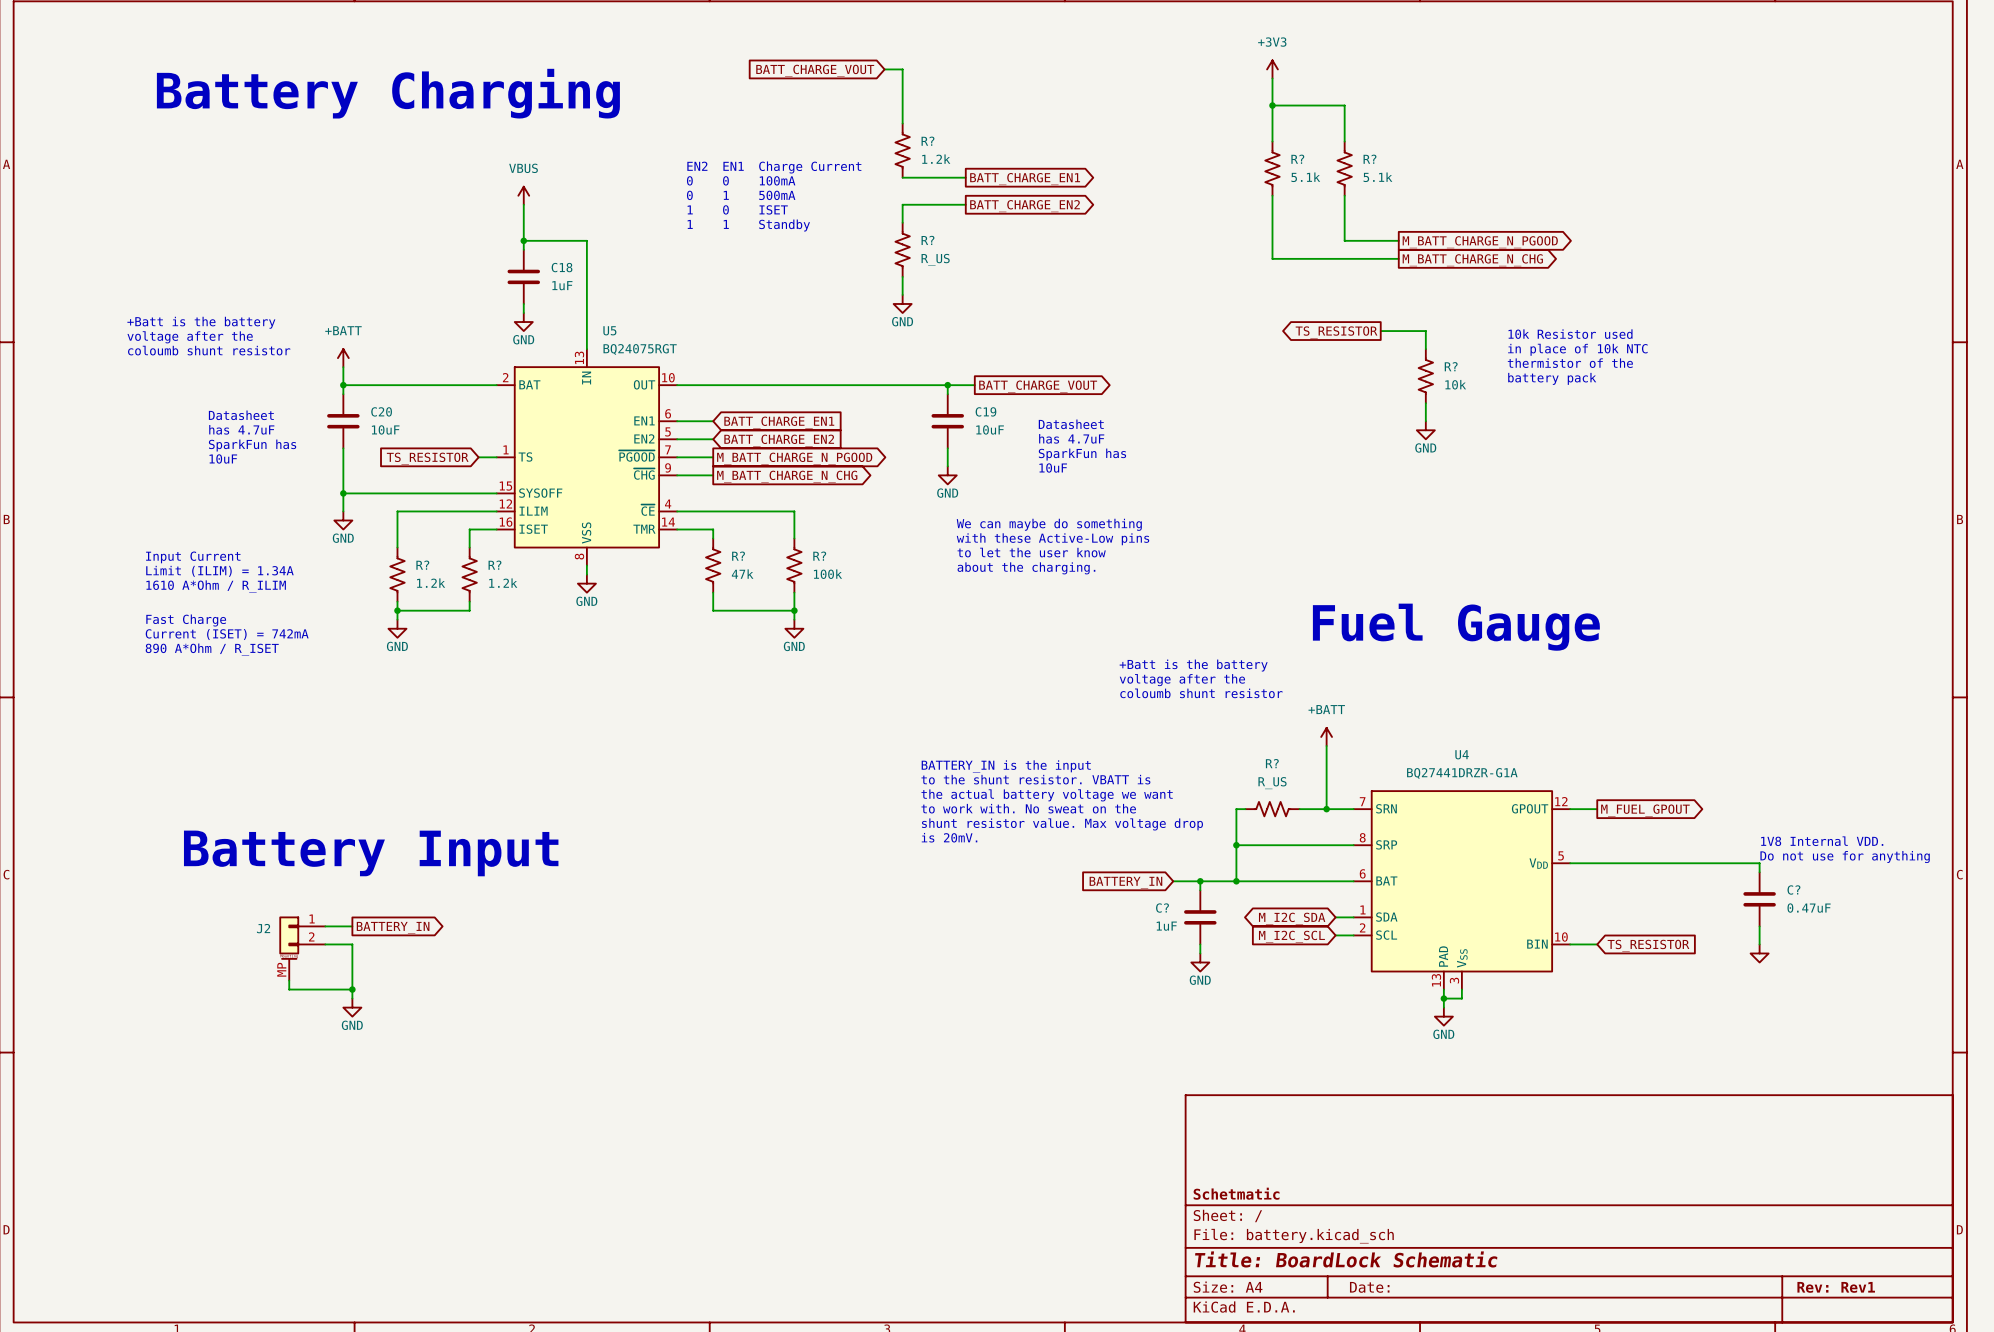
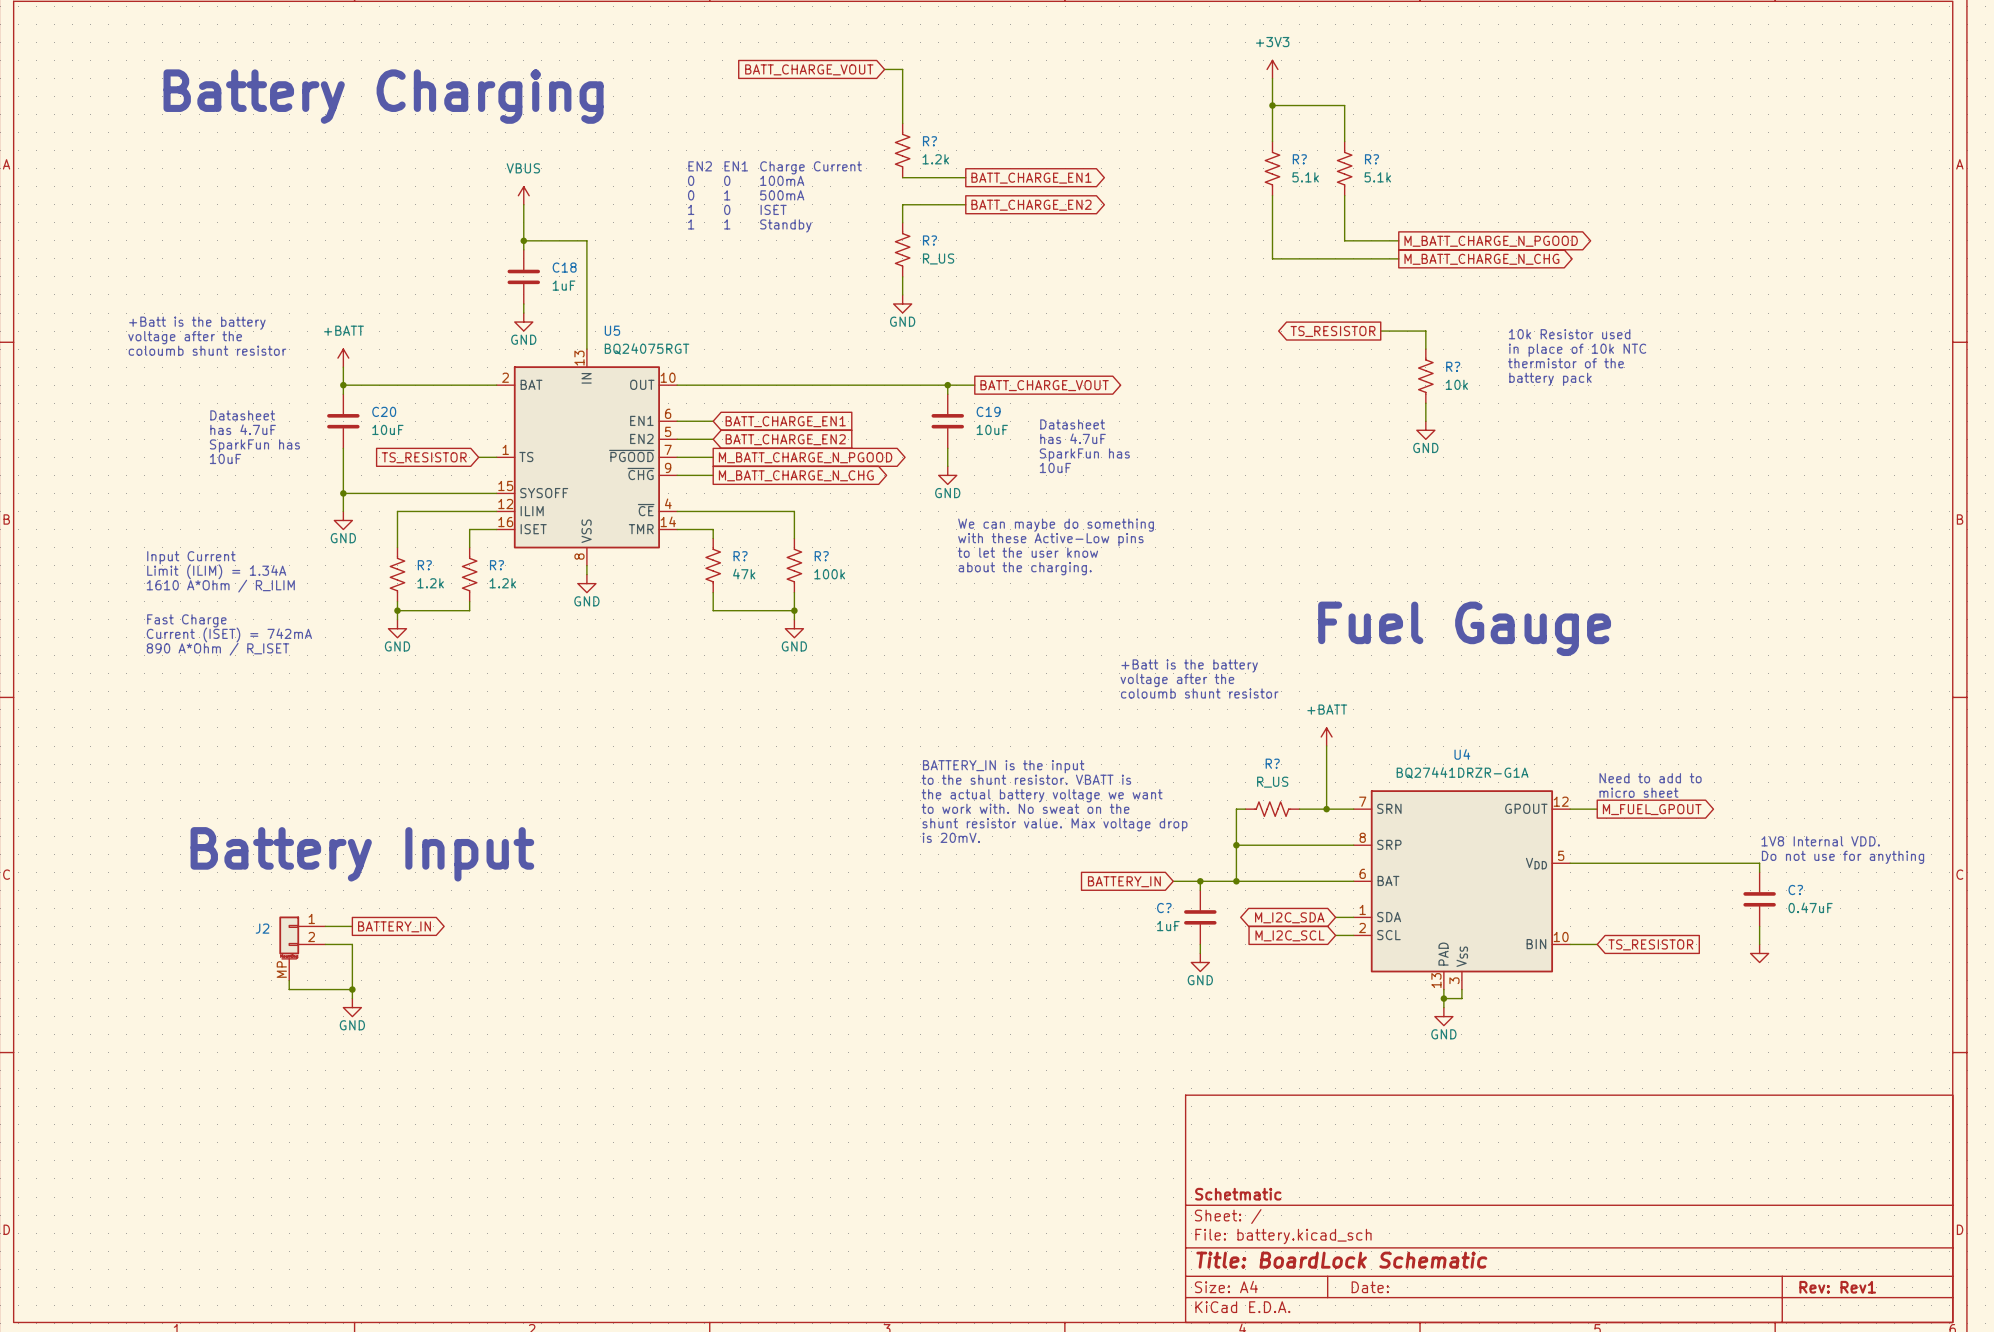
text: none -> Need to add to (1650, 778)
text: none -> micro sheet (1638, 792)

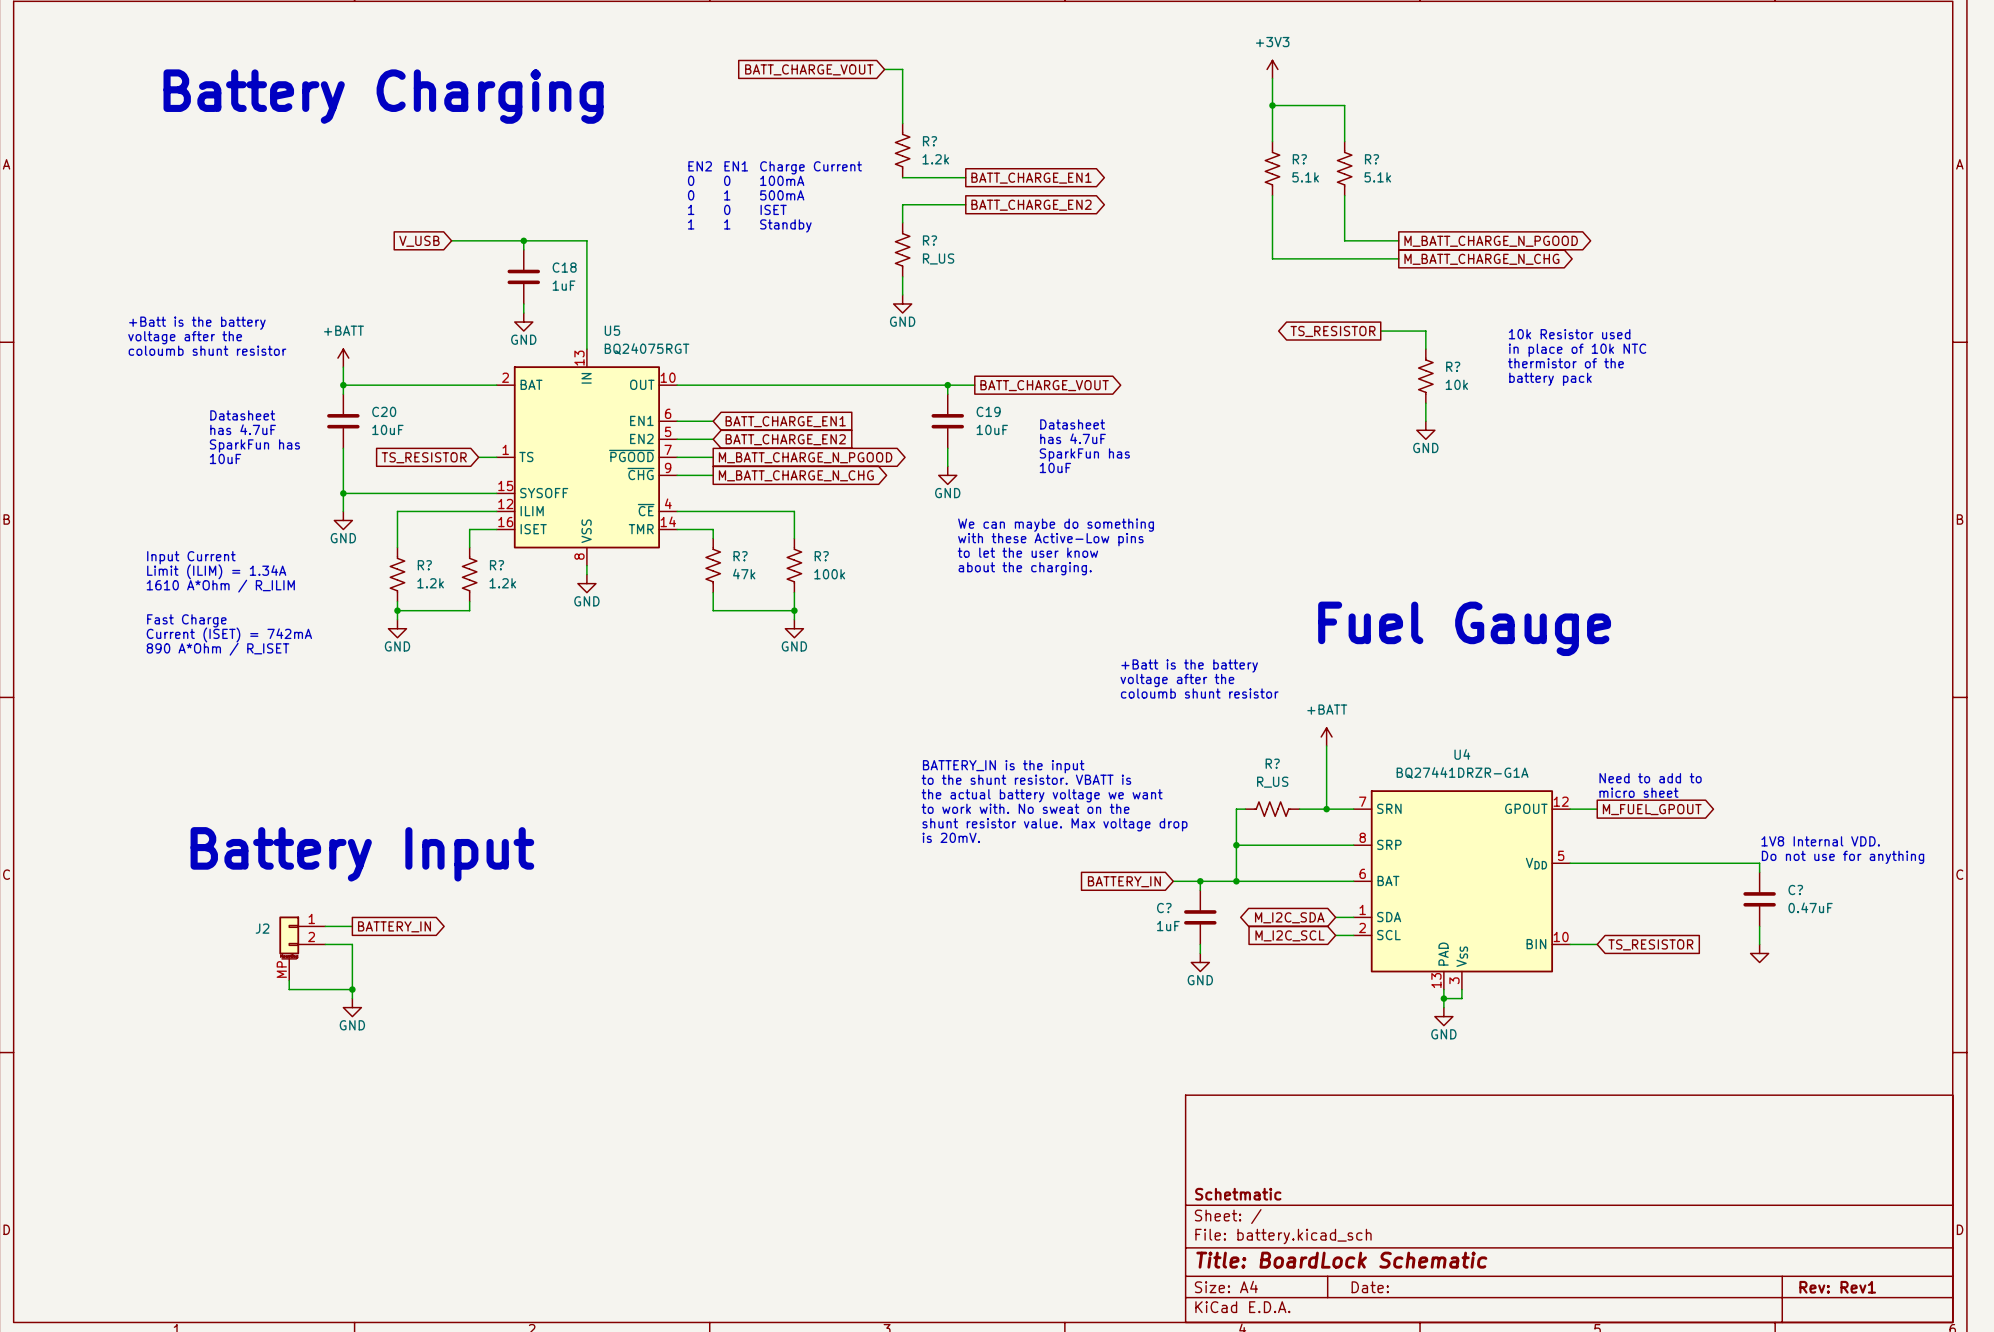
power symbol: VBUS (523, 195) -> none
wire: (523, 204) (523, 240) -> (451, 240) (523, 240)
global label: none -> V_USB (419, 241)

